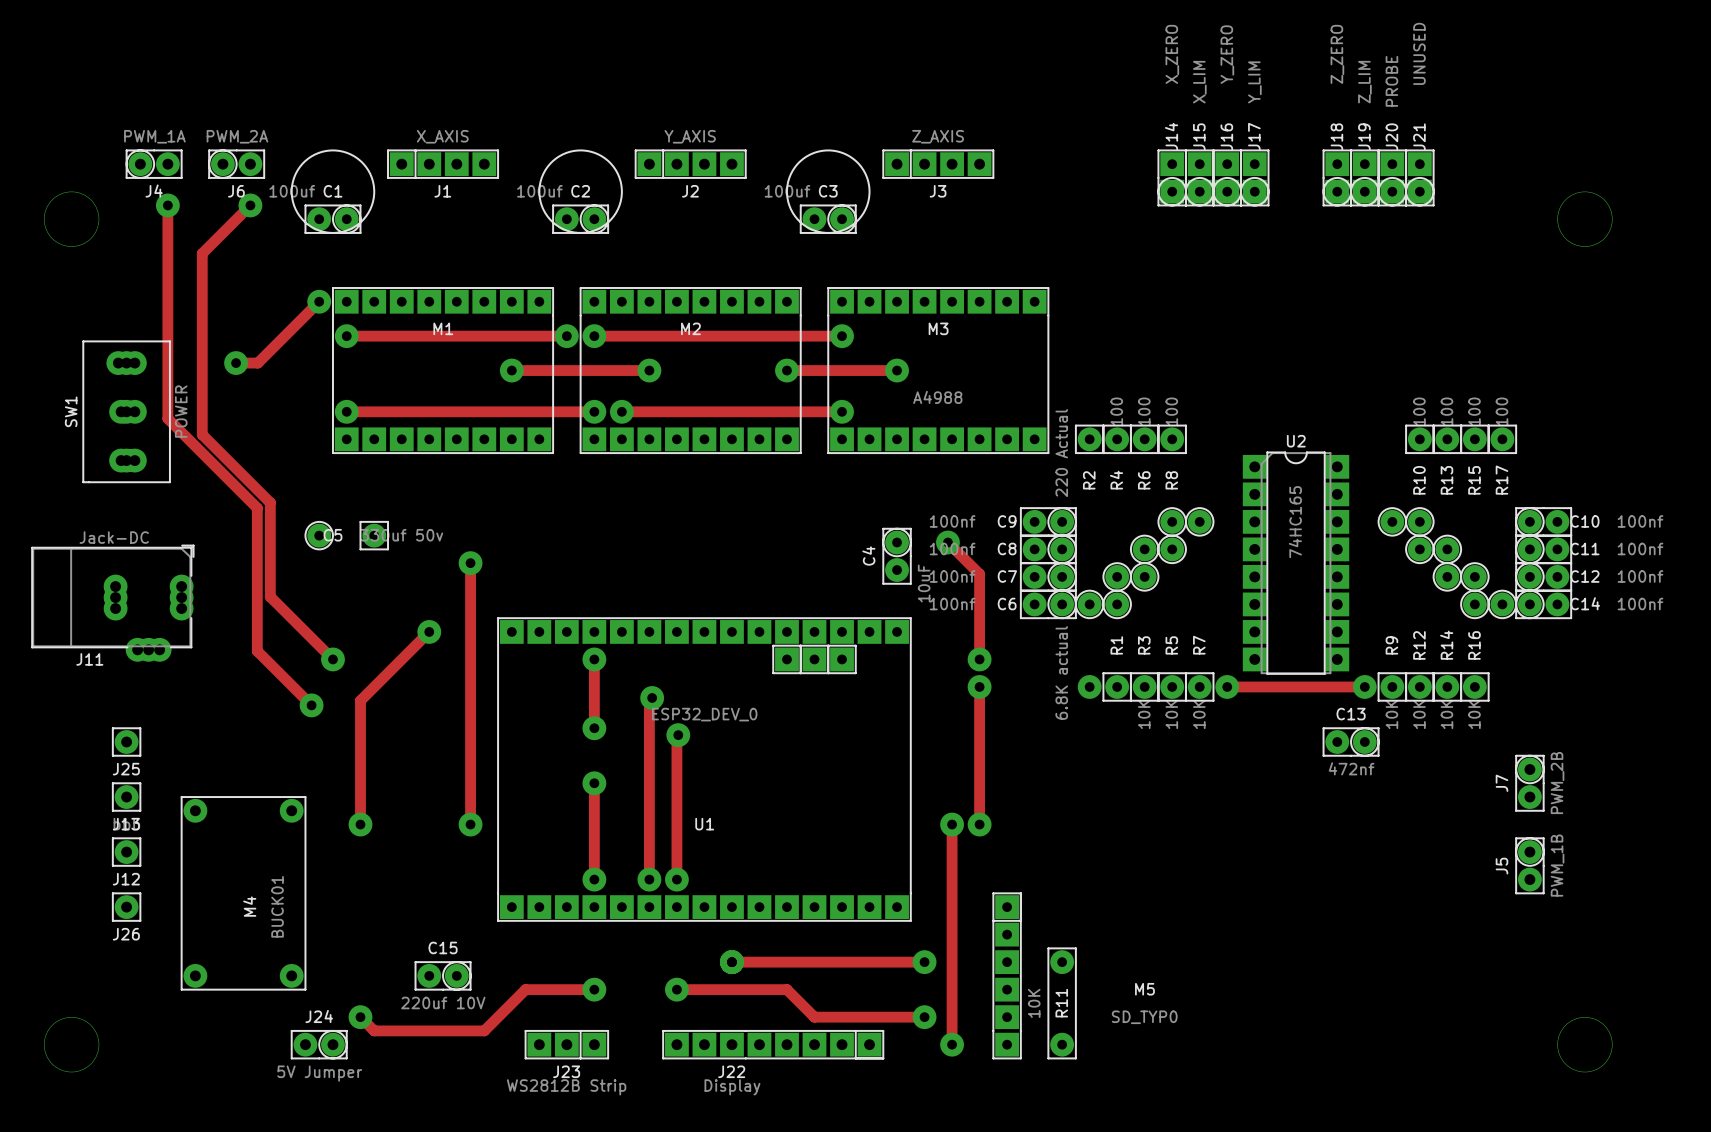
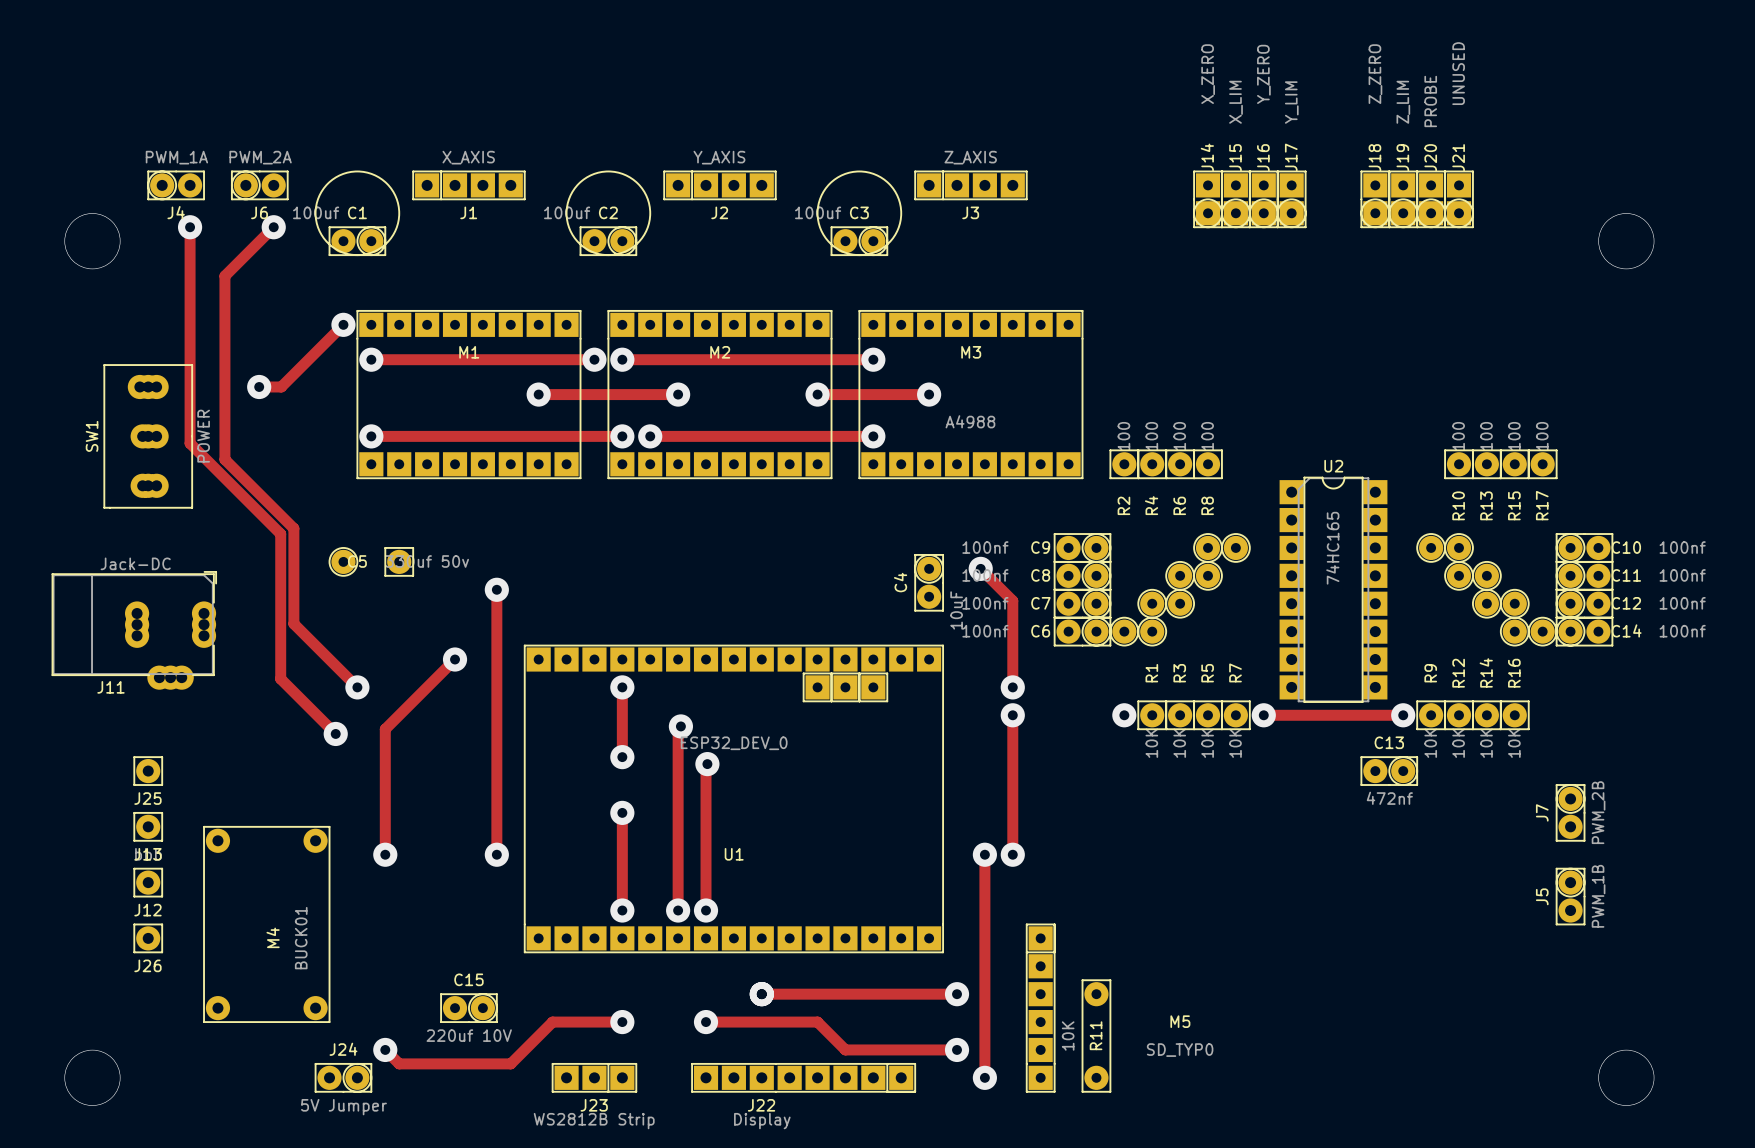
R2 value: 220 Actual (1061, 453) -> 100 (1123, 436)
R1 value: 6.8K actual (1061, 672) -> 10K (1151, 743)

